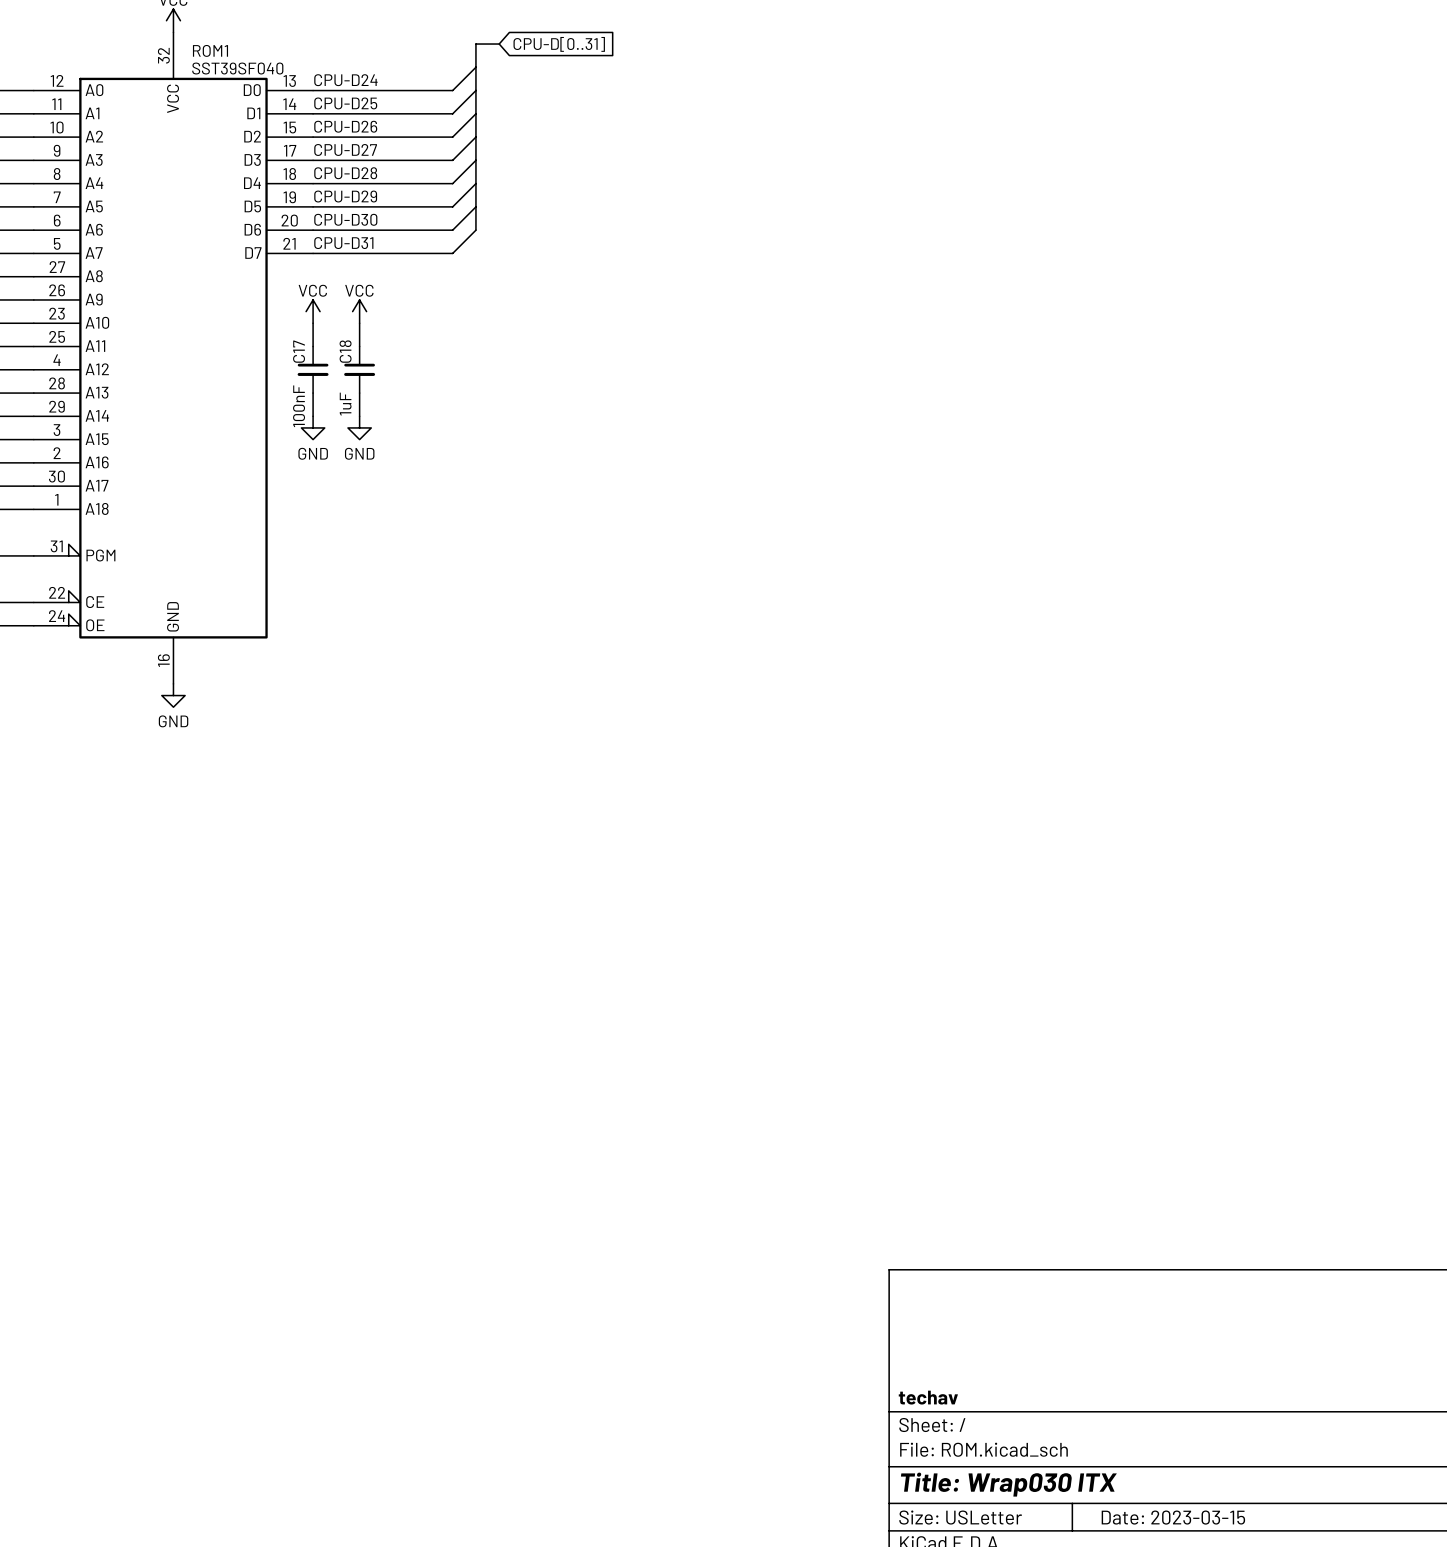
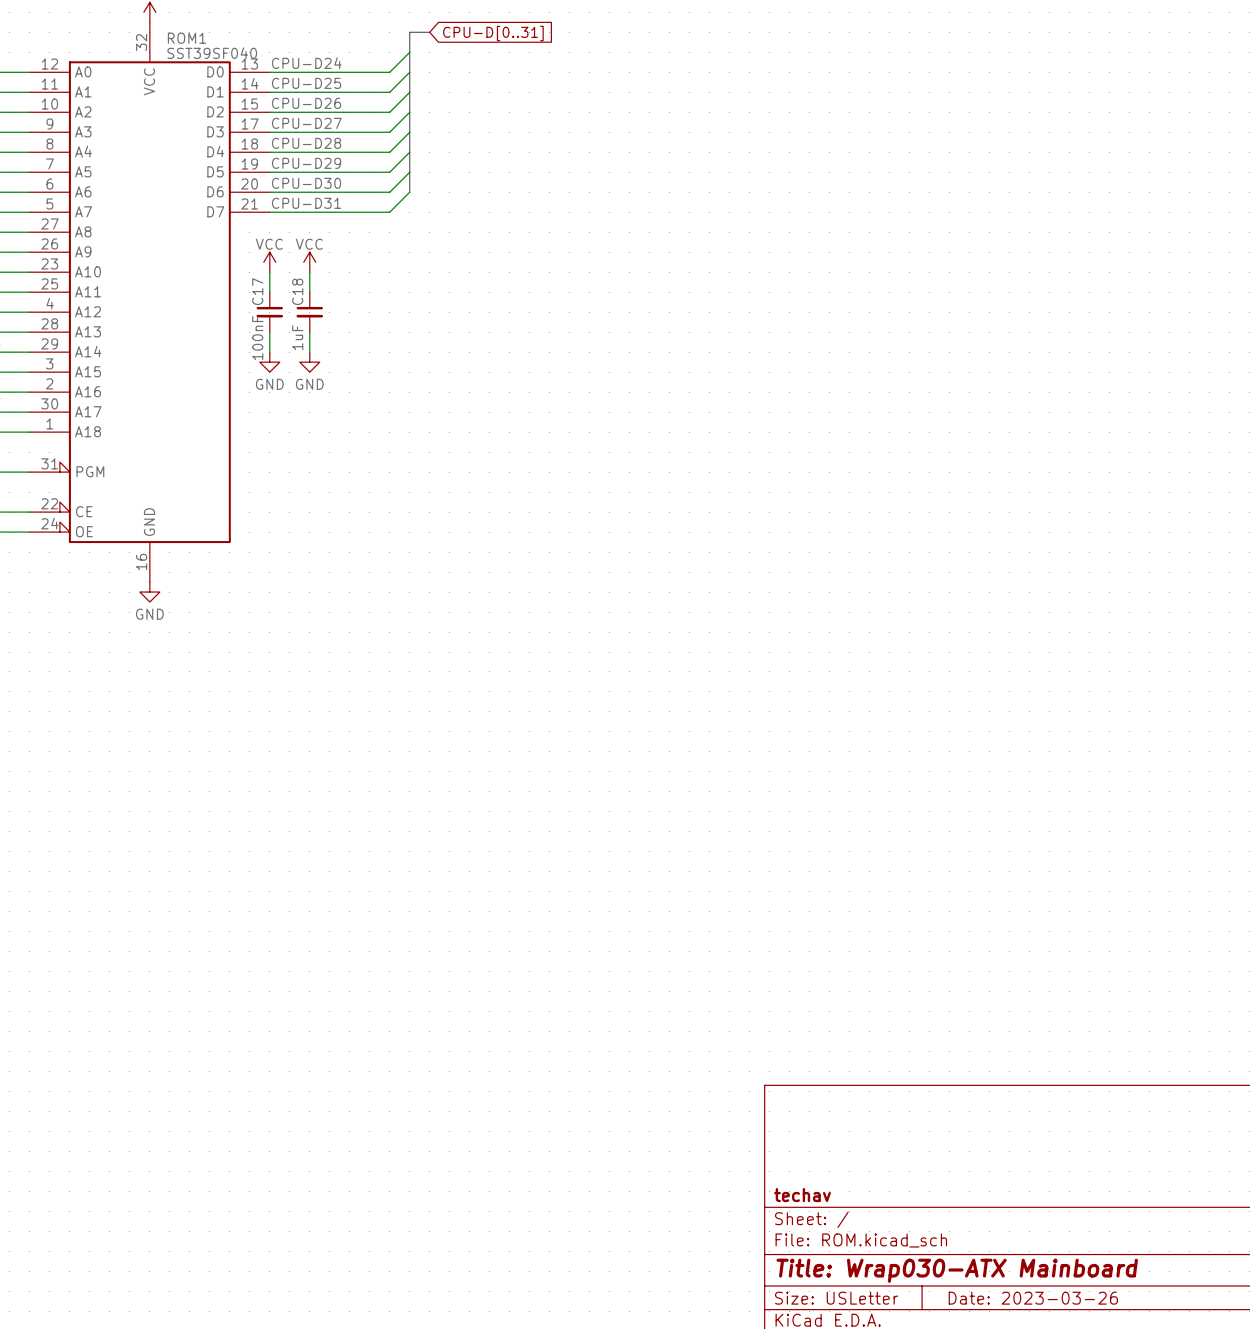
title block: Title: Wrap030 ITX (1008, 1484) -> Title: Wrap030-ATX Mainboard (957, 1270)
title block: Date: 2023-03-15 (1173, 1517) -> Date: 2023-03-26 (1033, 1298)

